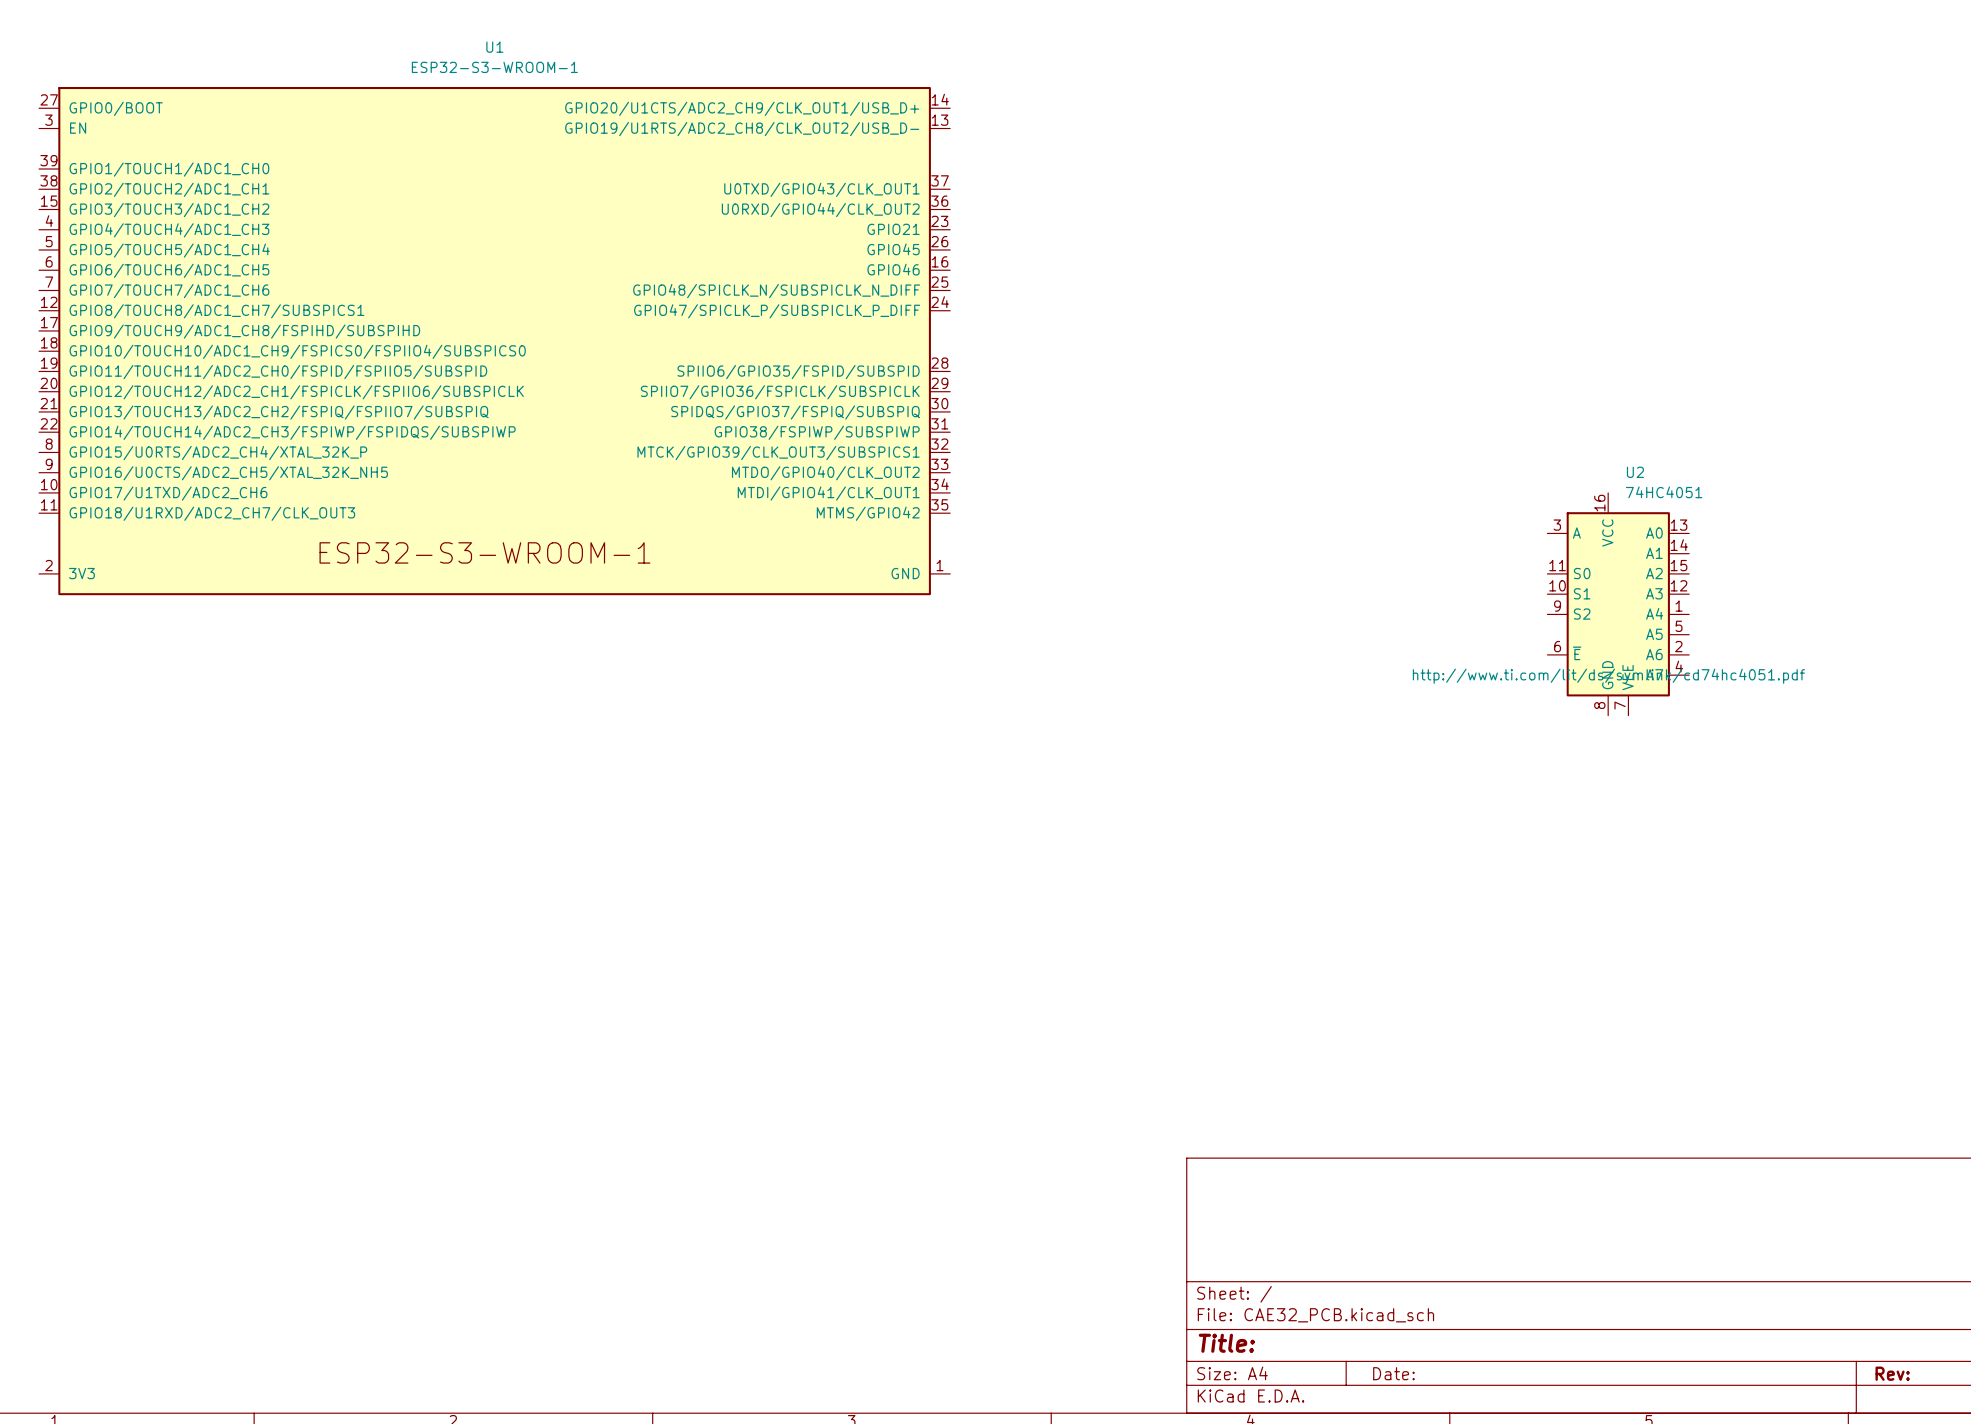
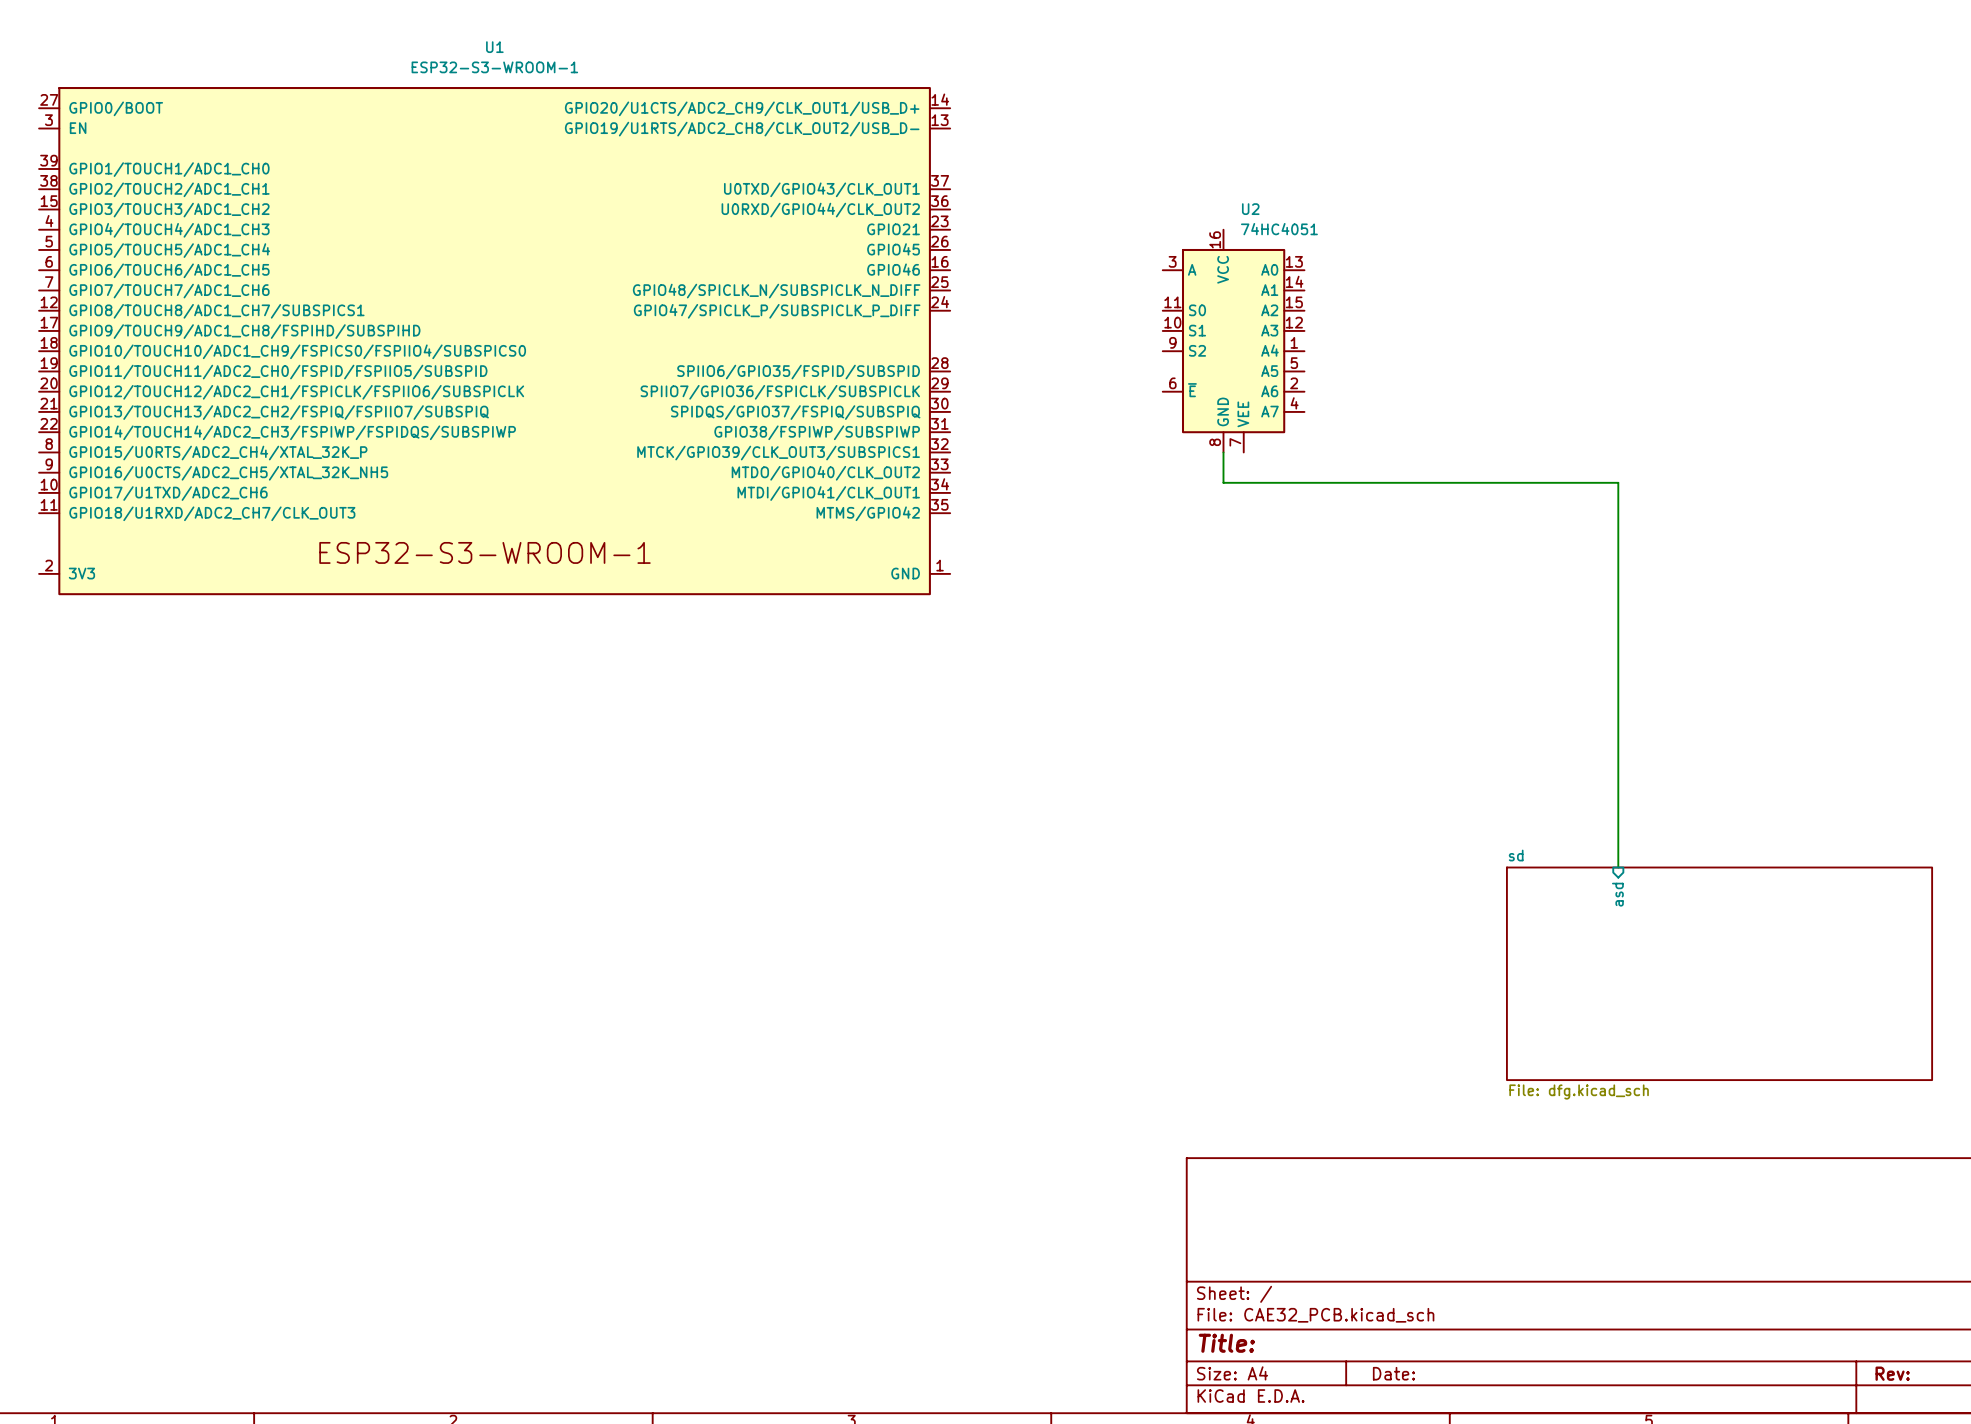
wire: none -> (1223, 452) (1223, 482) (1618, 482) (1618, 867)
U2 position: (1618, 604) -> (1233, 341)
U2 text: http://www.ti.com/lit/ds/symlink/cd74hc4051.pdf (1608, 676) -> none
sheet pin: none -> asd (1617, 894)
sheet sd: none -> File: dfg.kicad_sch (1719, 973)

